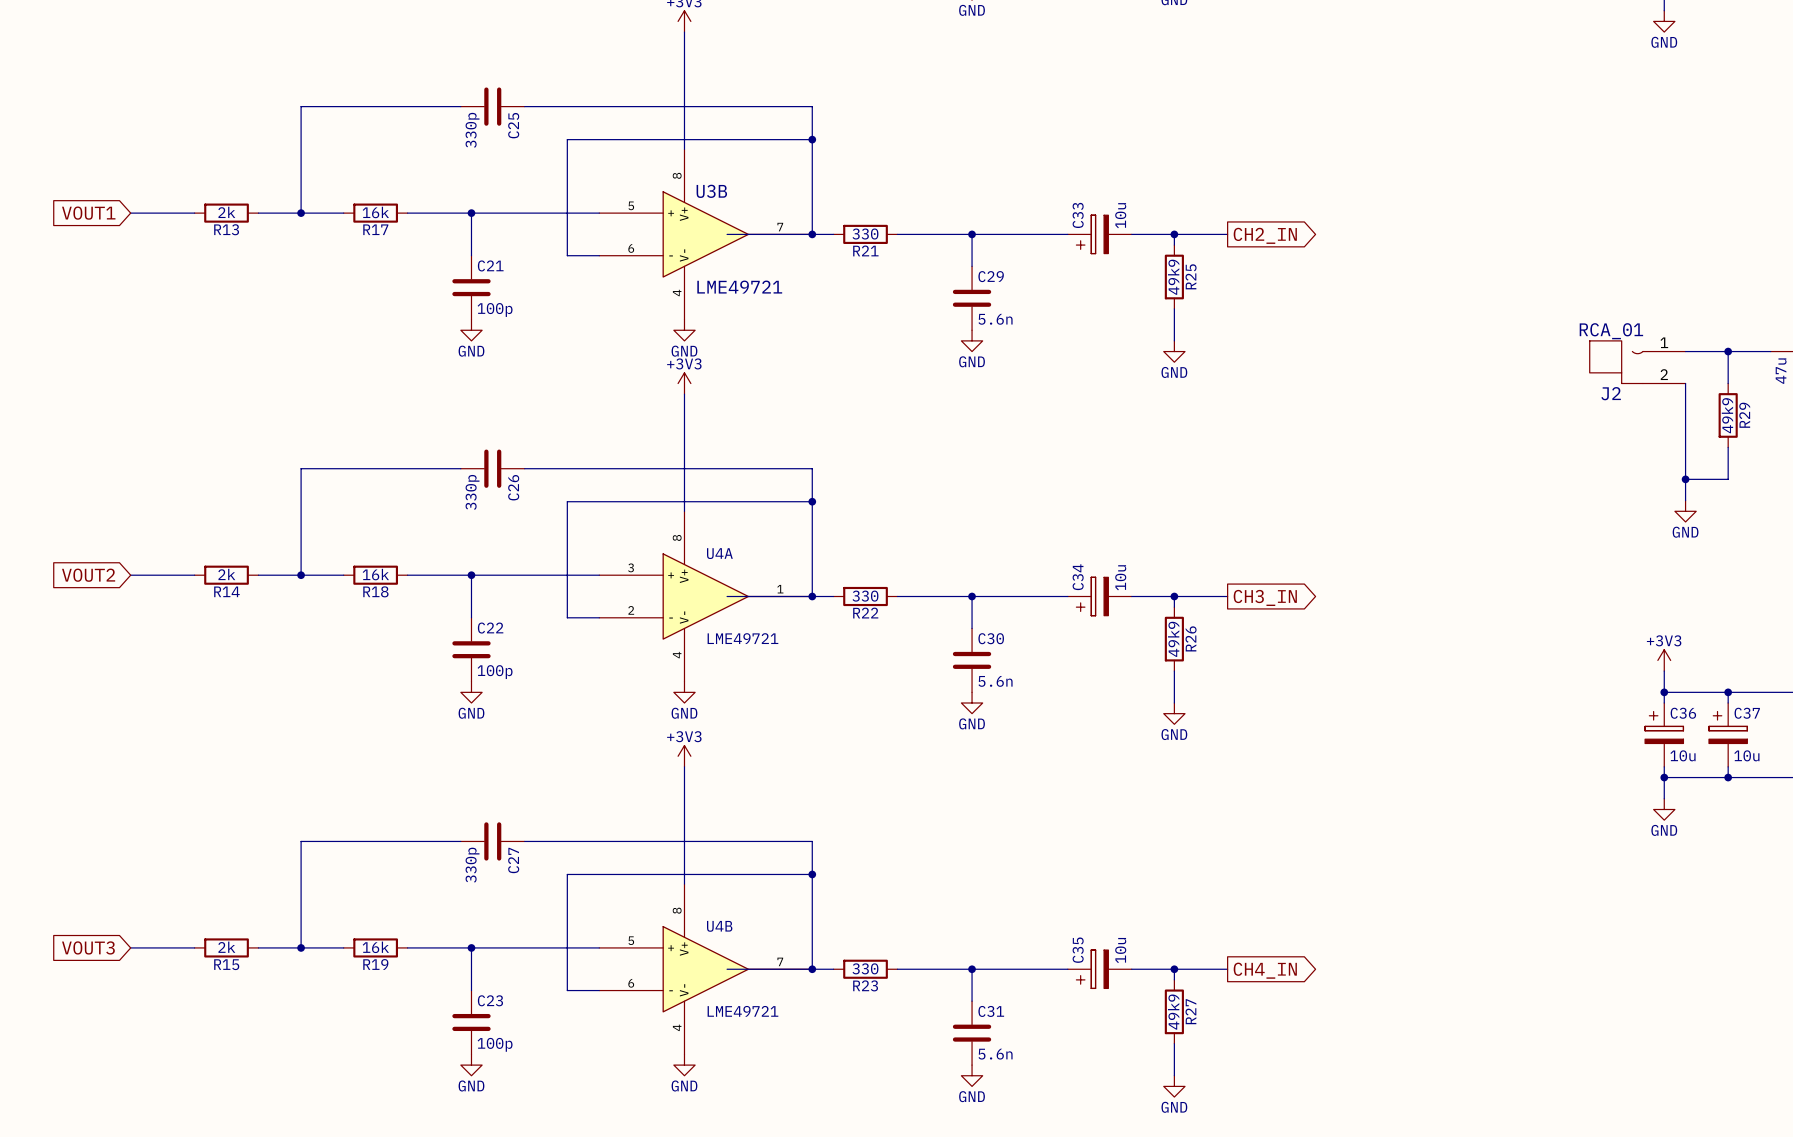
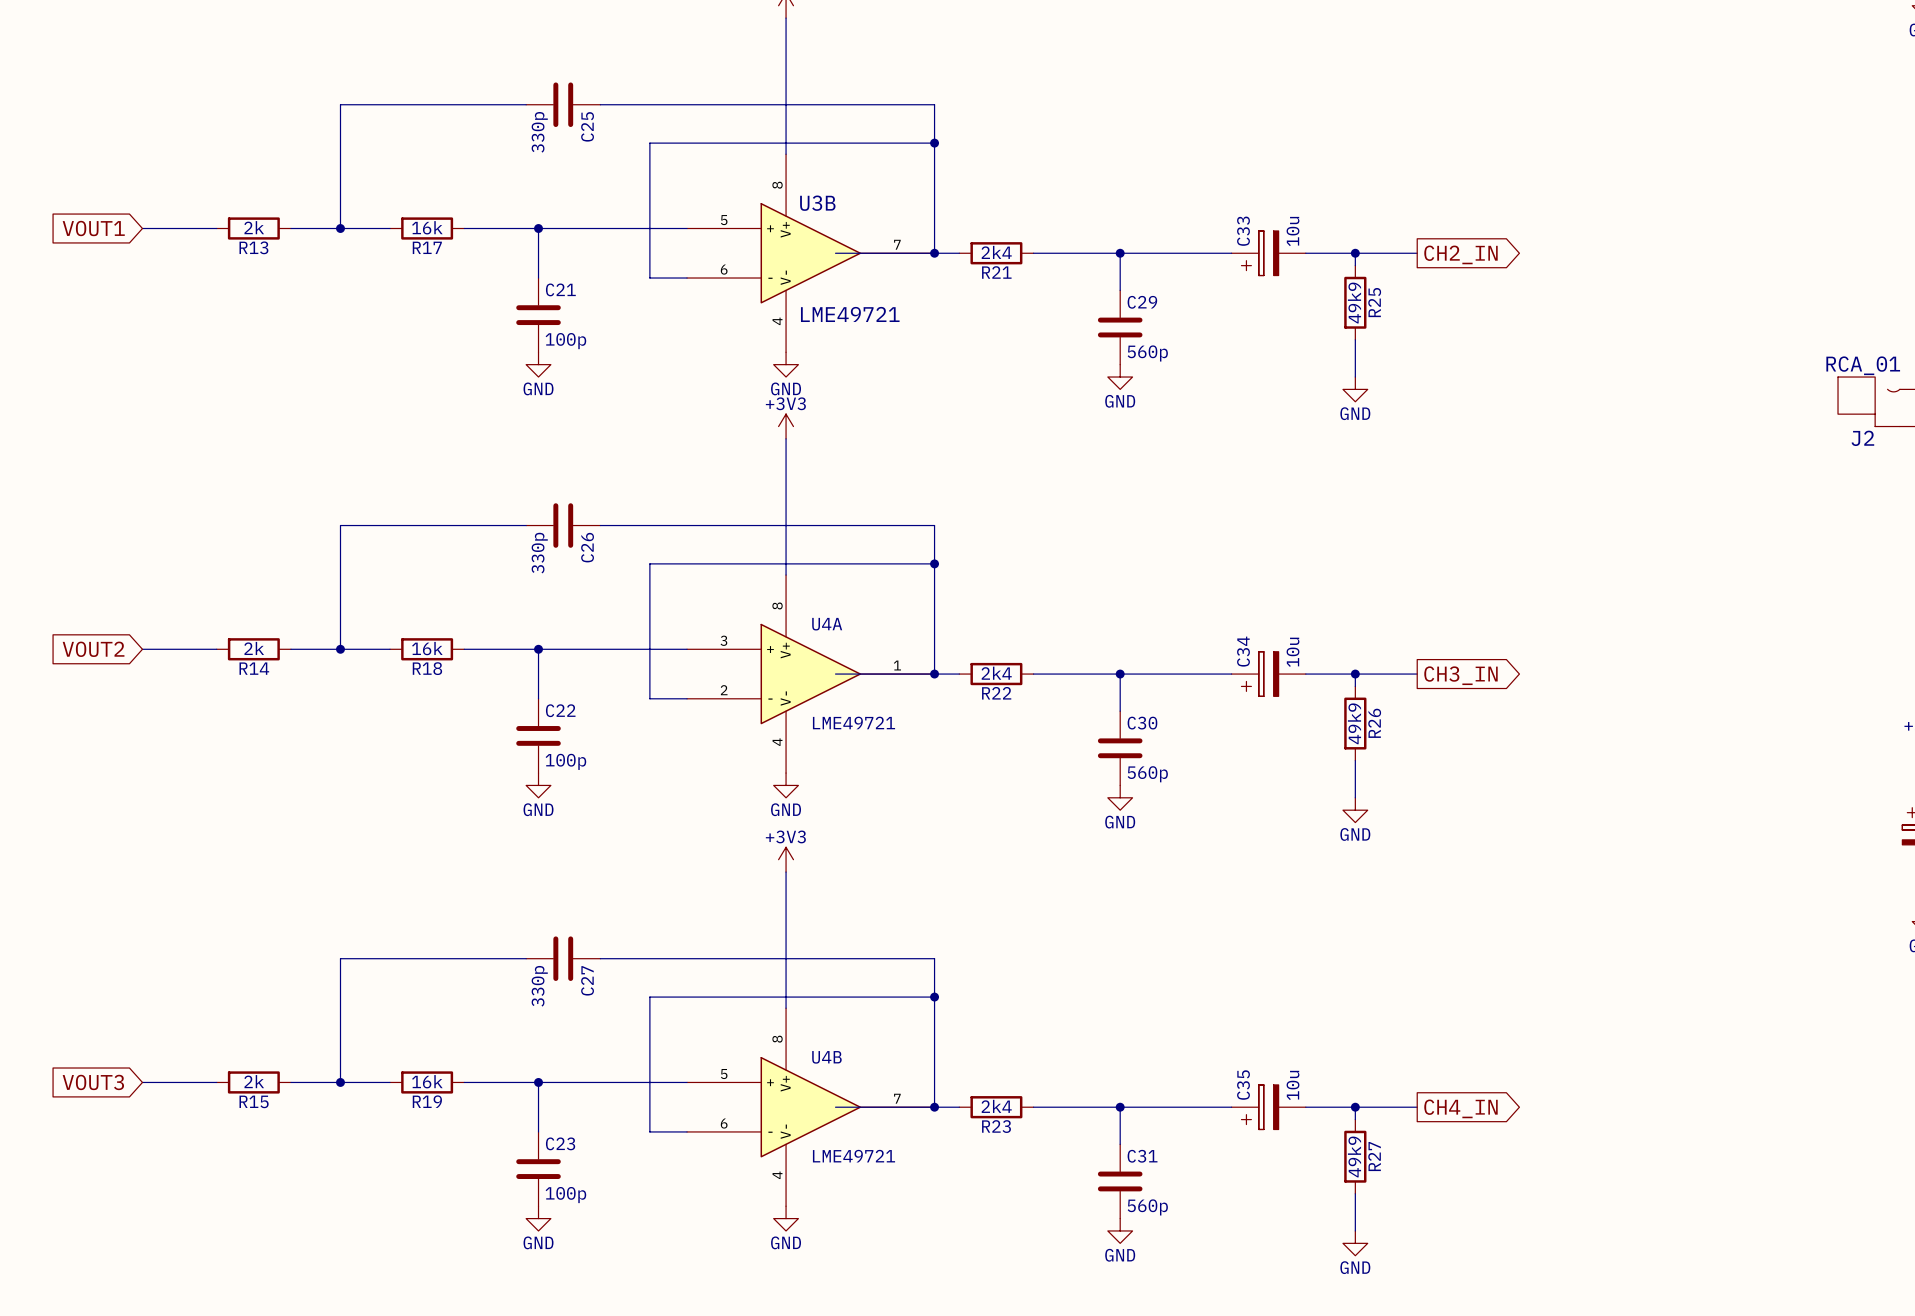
R21 value: 330 (865, 234) -> 2k4 (996, 252)
C29 value: 5.6n (995, 319) -> 560p (1147, 353)
R22 value: 330 (865, 596) -> 2k4 (996, 673)
C30 value: 5.6n (995, 681) -> 560p (1147, 774)
R23 value: 330 (865, 968) -> 2k4 (996, 1106)
C31 value: 5.6n (995, 1054) -> 560p (1147, 1207)

